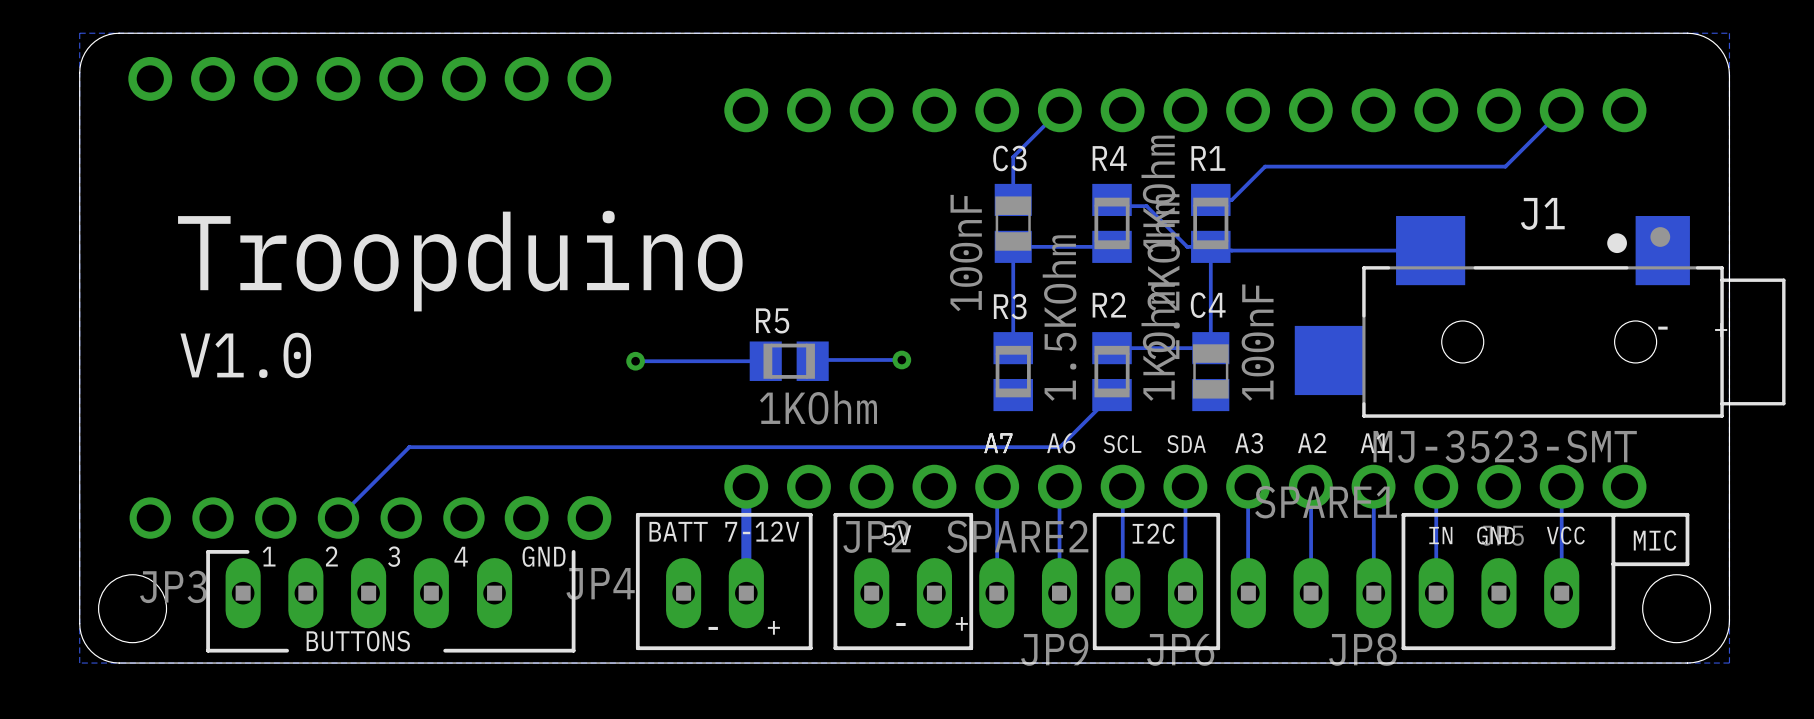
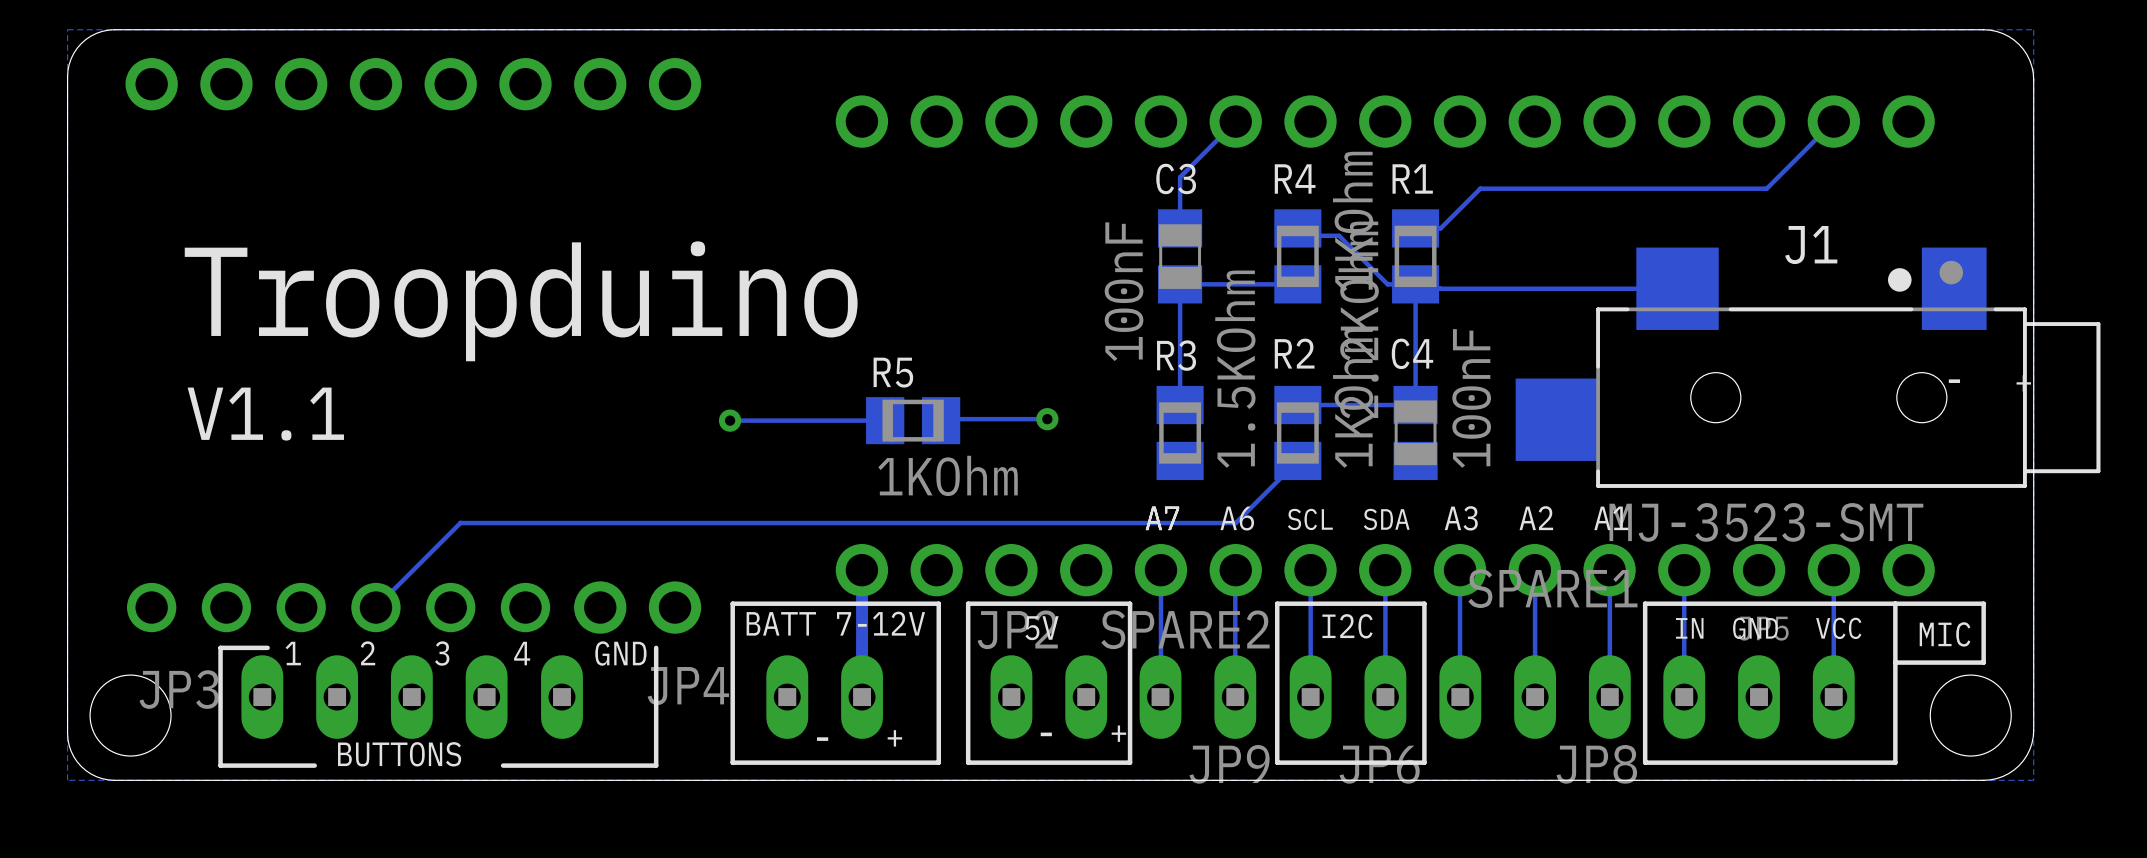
text: V1.0 (245, 355) -> V1.1 (265, 414)

